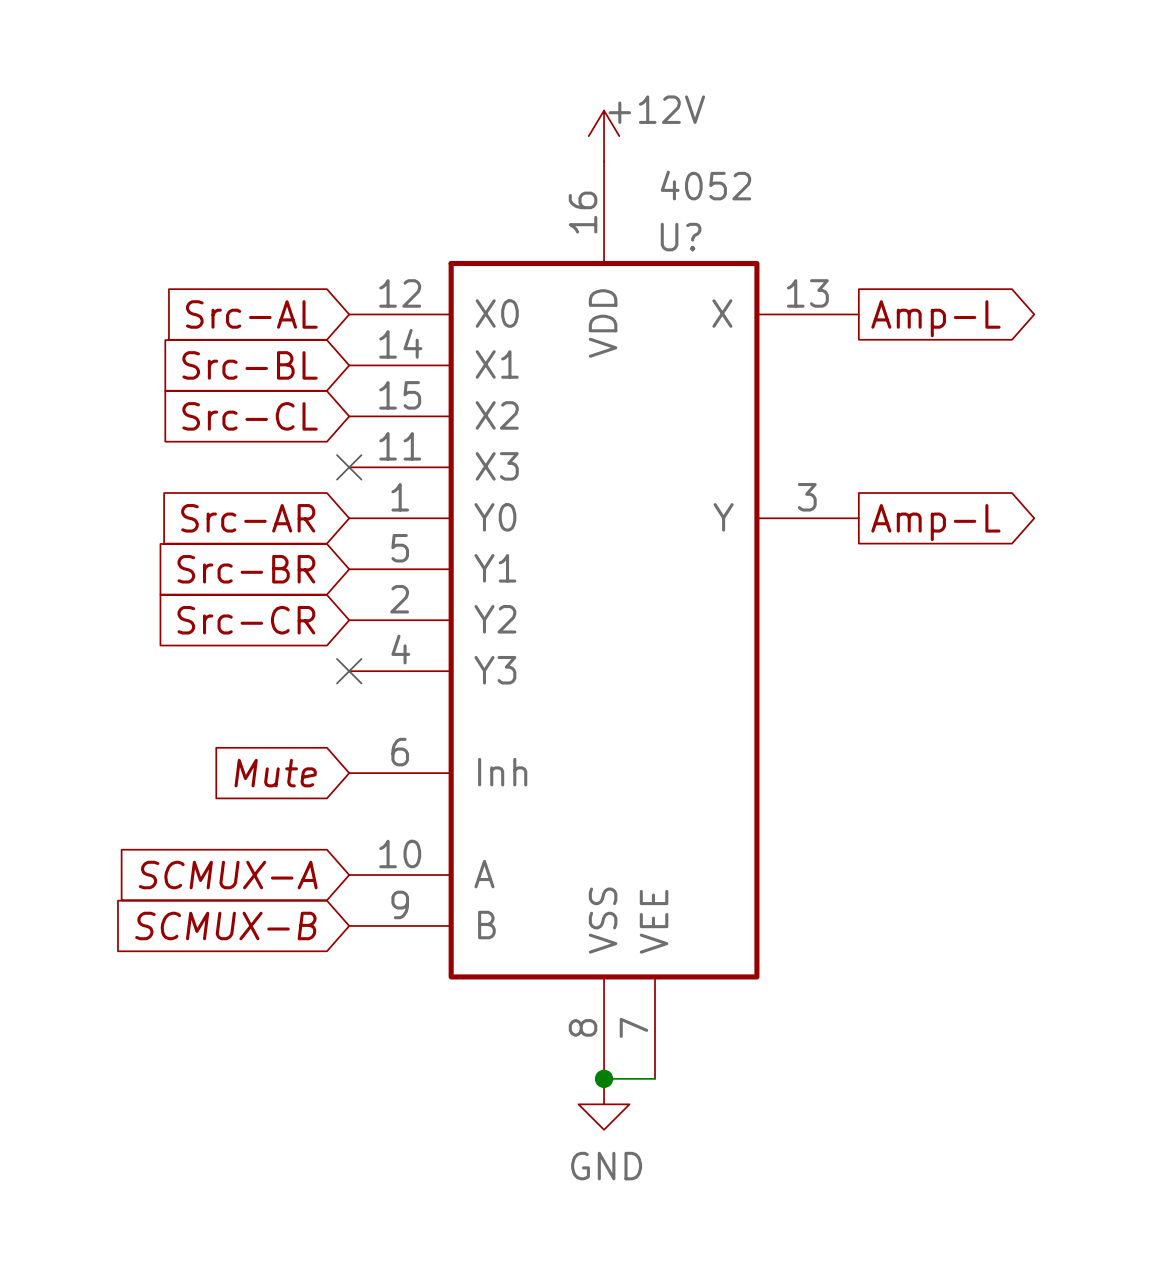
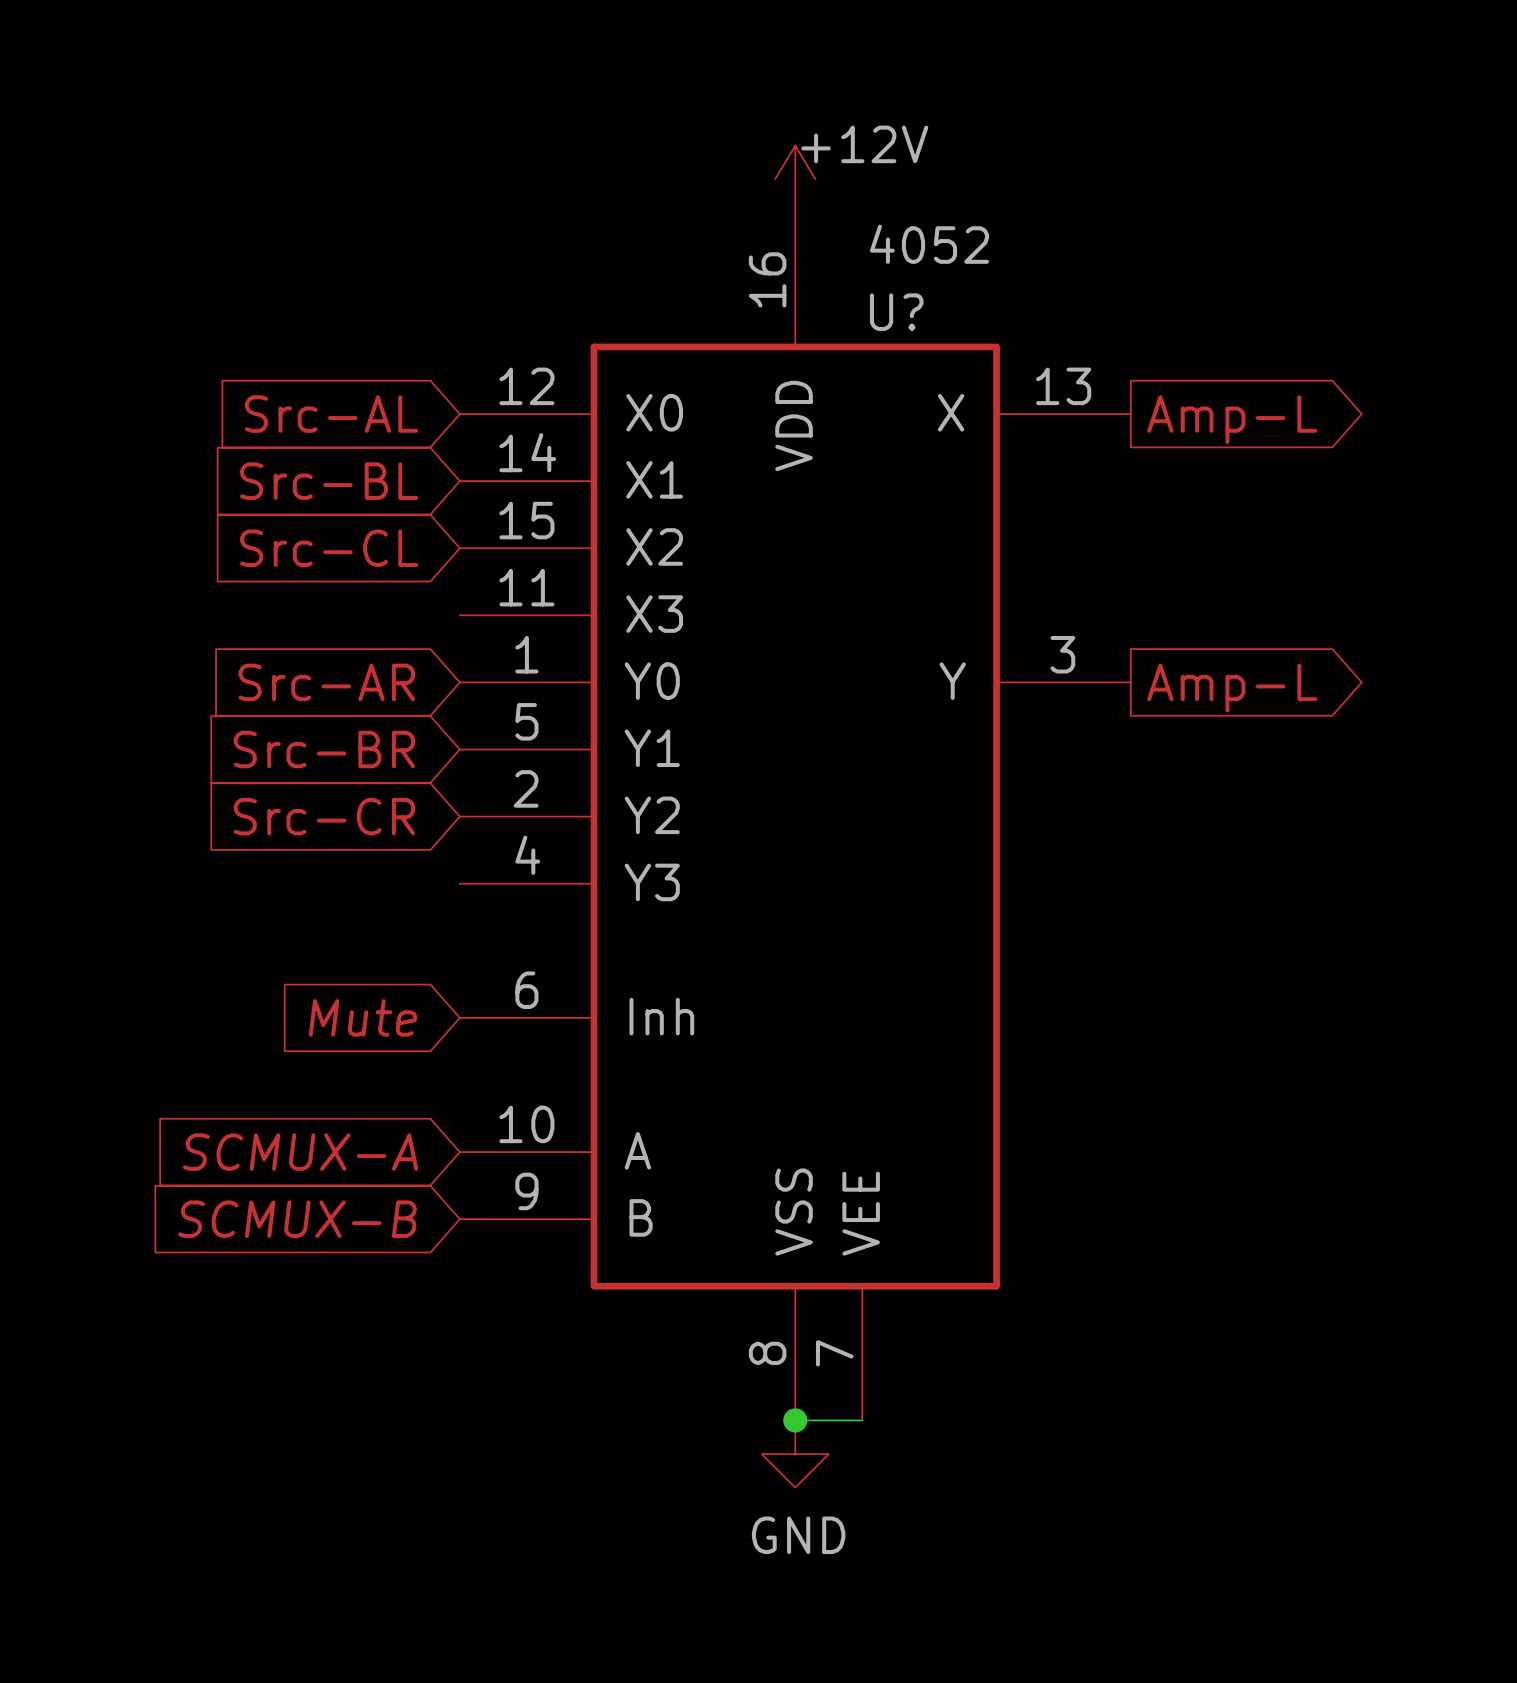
no-connect mark: (349, 467) -> none
no-connect mark: (349, 671) -> none

